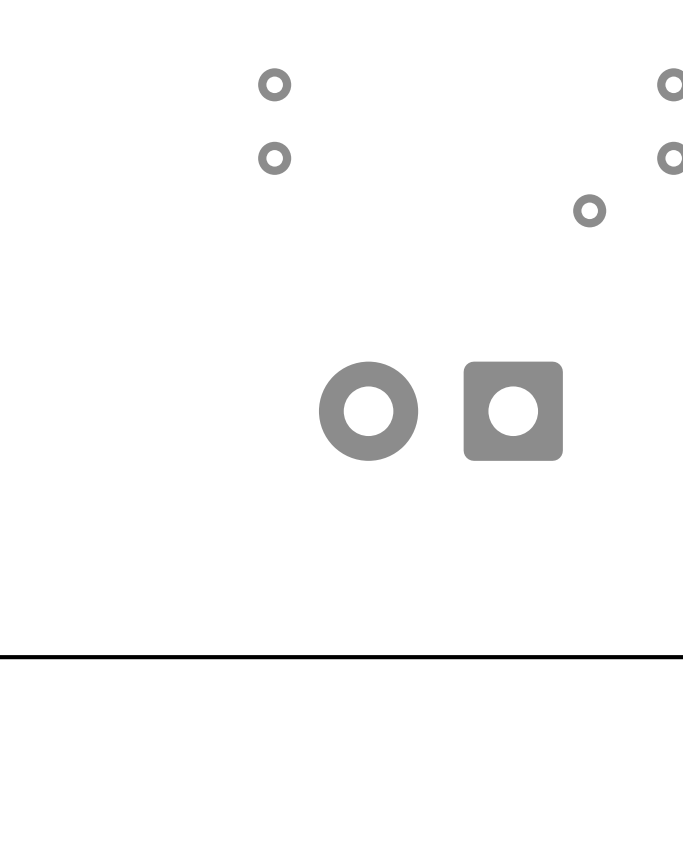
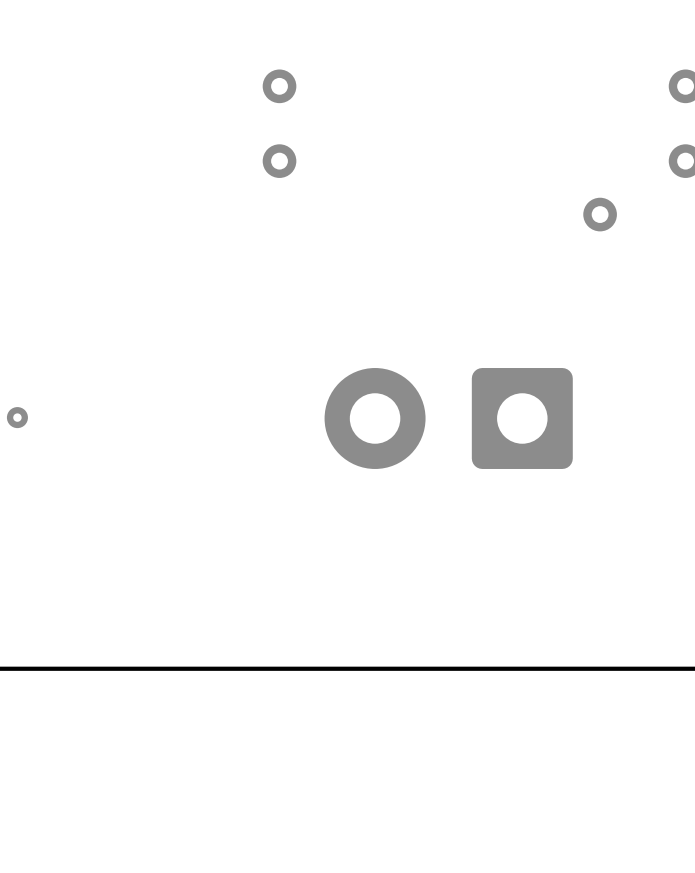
via: none -> (17, 417)

